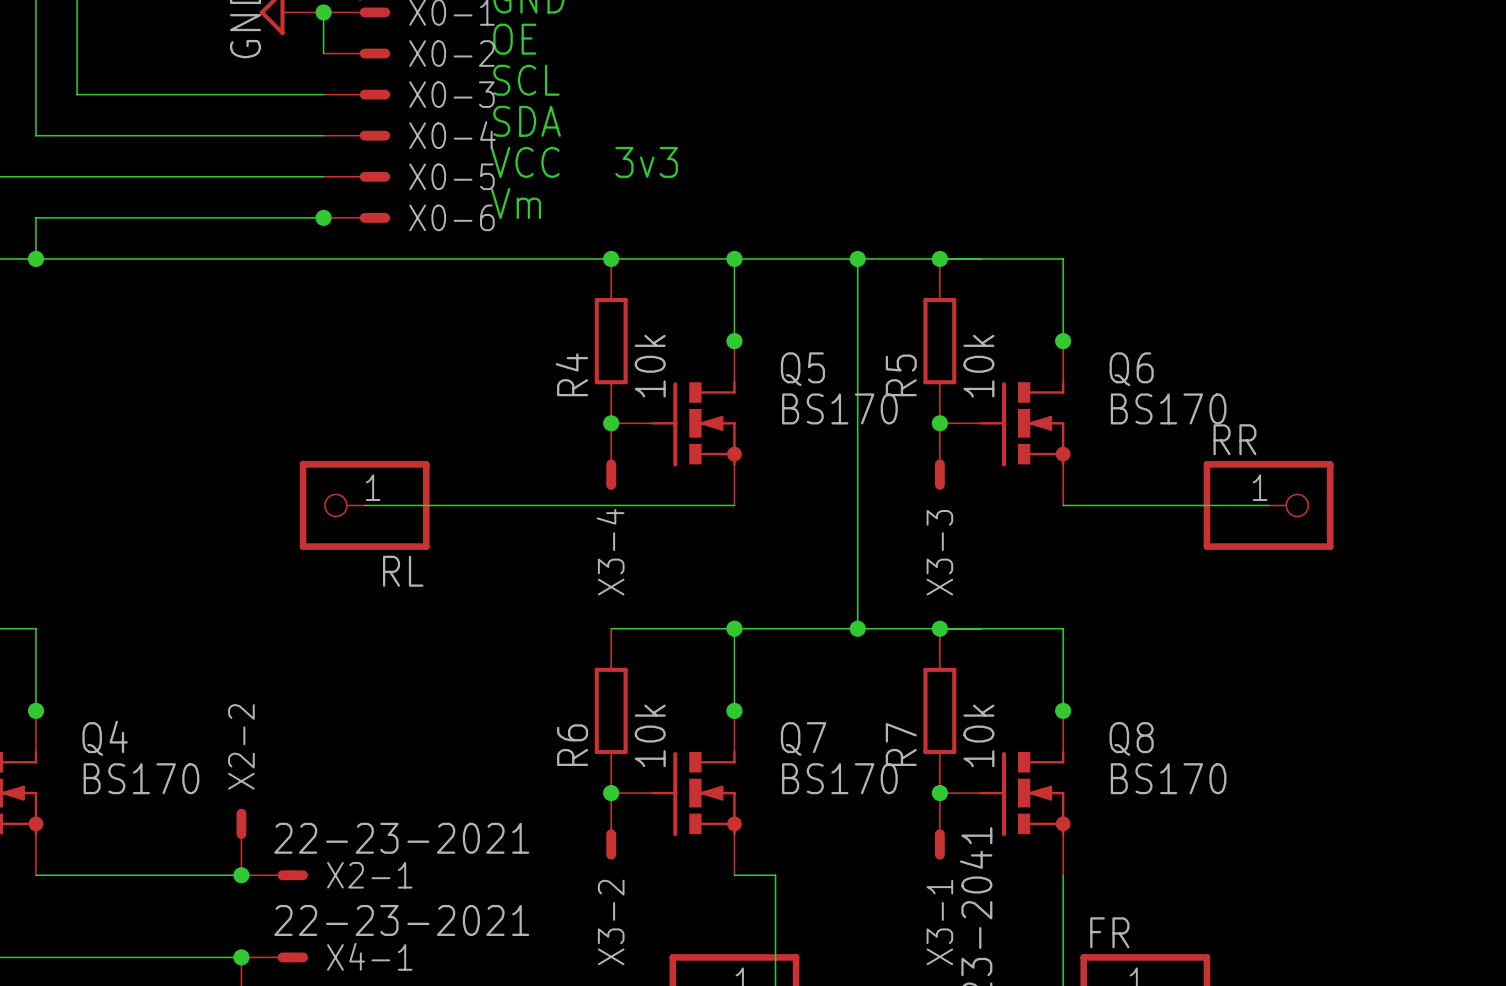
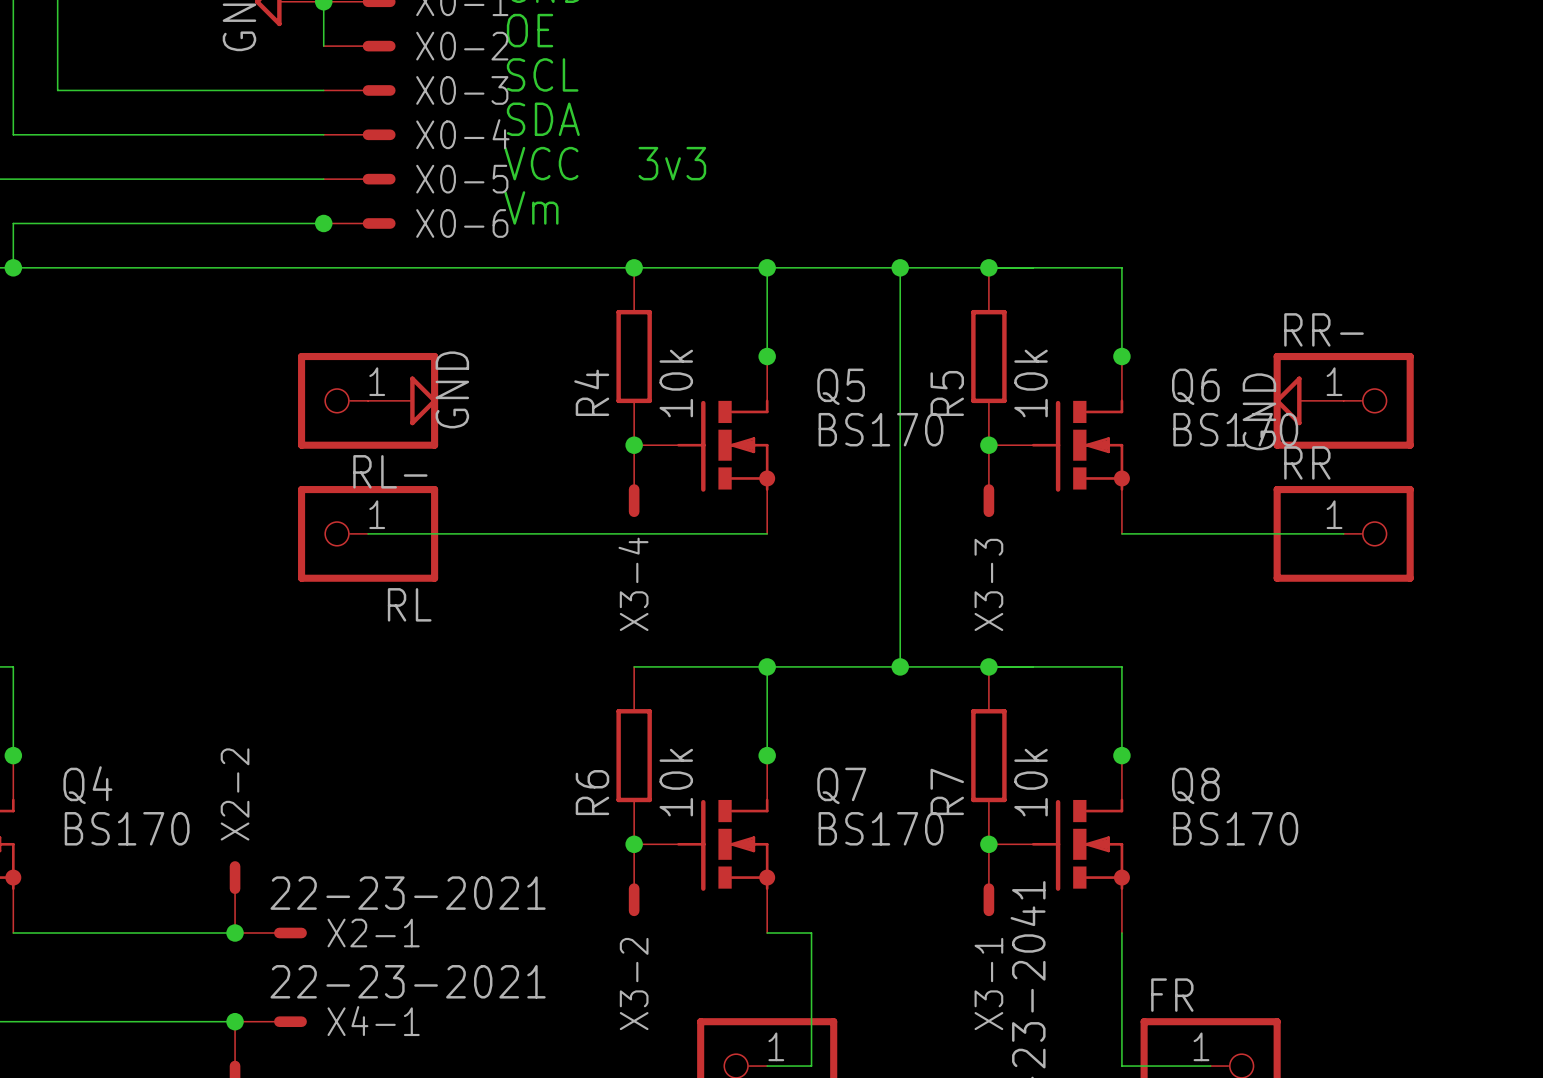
RL-: none -> (368, 400)
power symbol: none -> GND (402, 400)
power symbol: none -> GND (1309, 400)
RR-: none -> (1343, 400)

